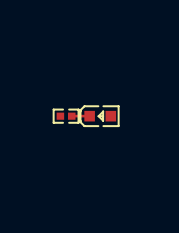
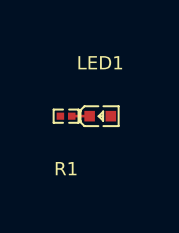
LED1 name: none -> LED1 (100, 62)
R1 name: none -> R1 (66, 168)

